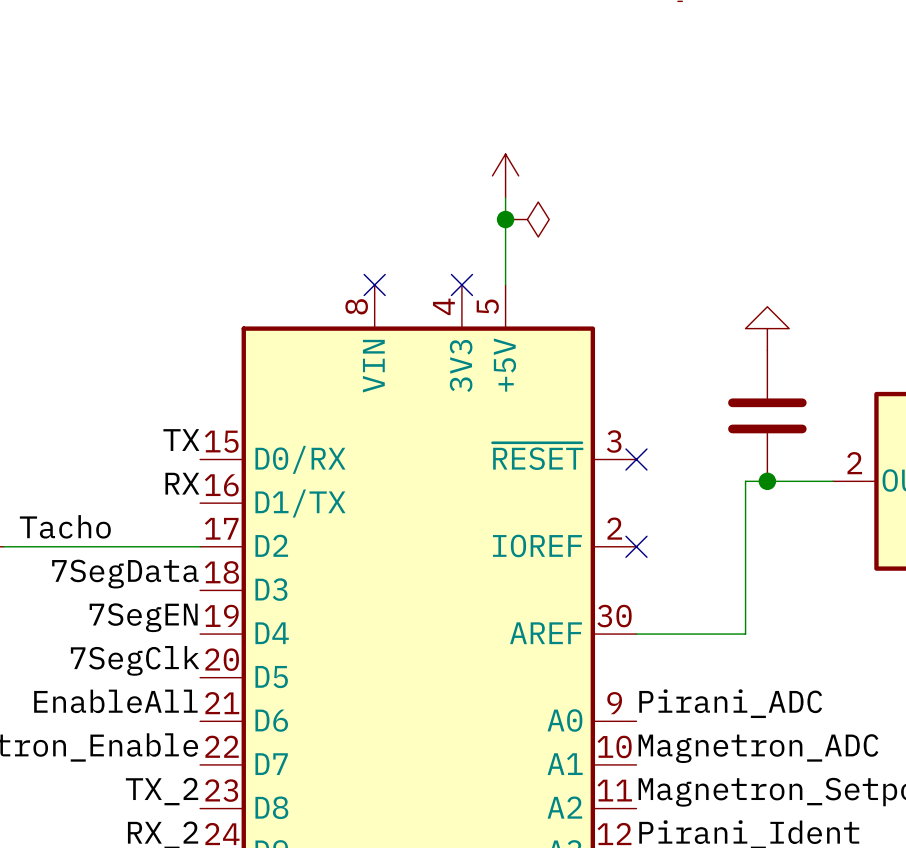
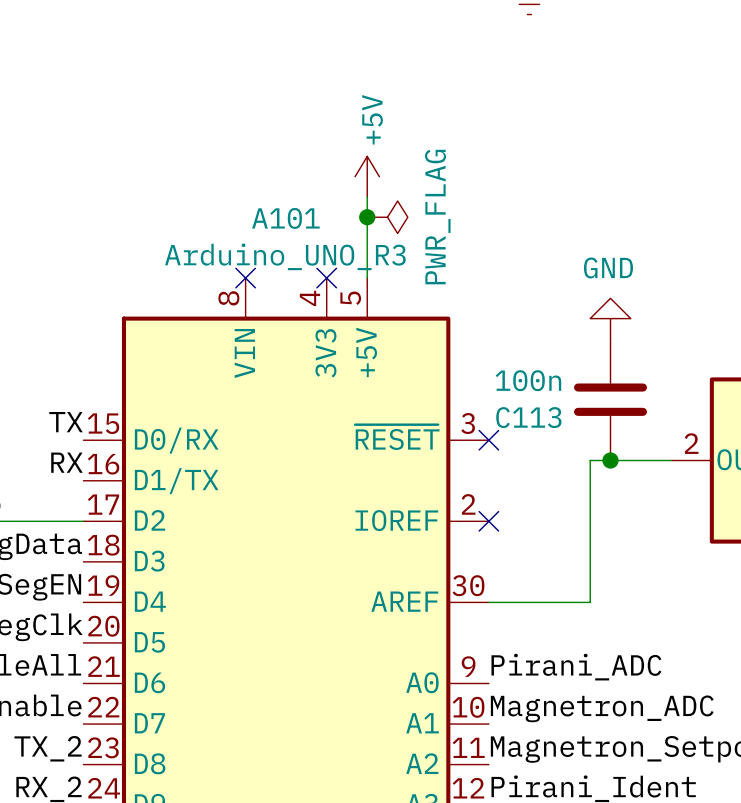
power symbol text: none -> +5V (372, 119)
power symbol text: none -> PWR_FLAG (437, 217)
A101 name: none -> A101 (285, 218)
A101 value: none -> Arduino_UNO_R3 (285, 256)
power symbol text: none -> GND (608, 267)
C113 value: none -> 100n (528, 380)
C113 name: none -> C113 (528, 417)

